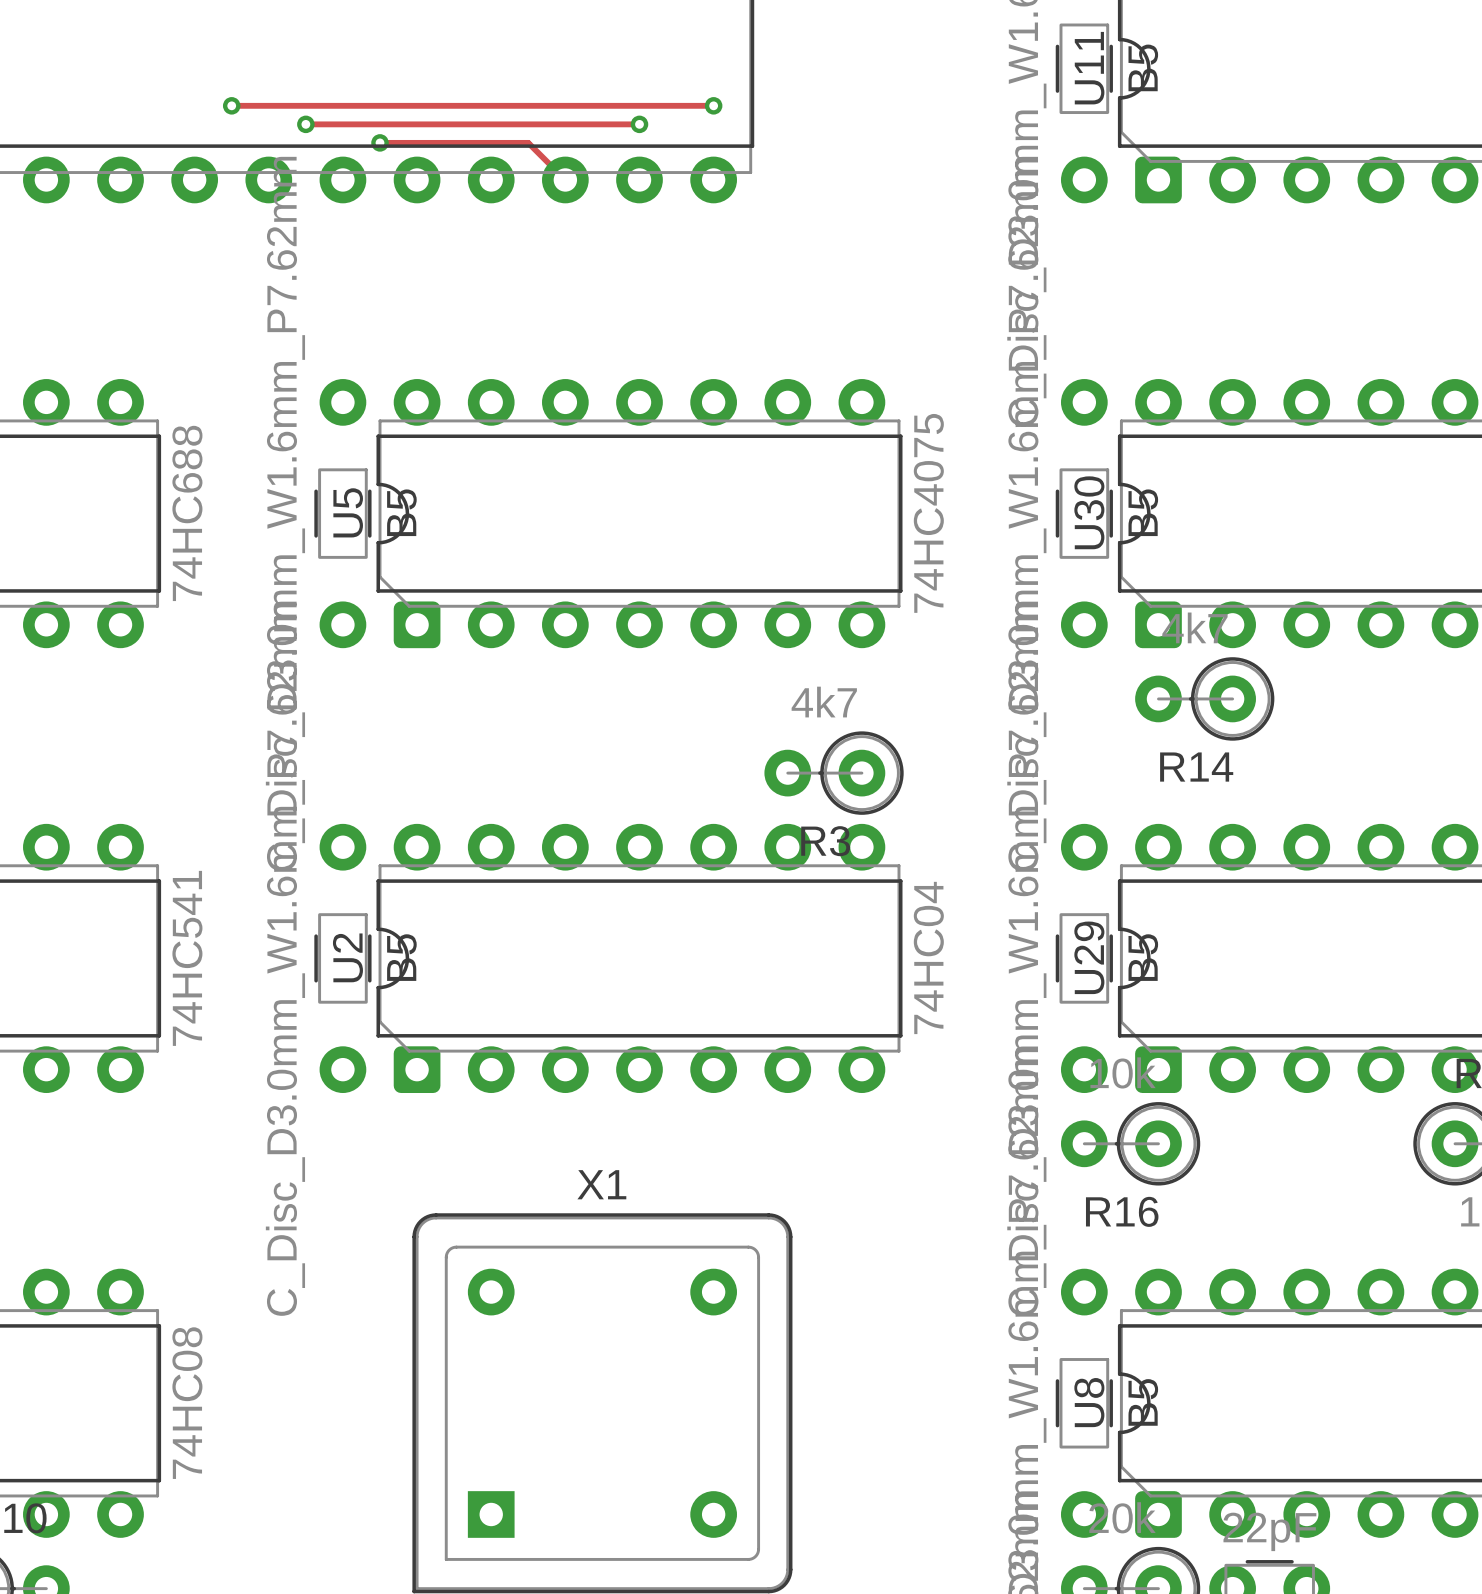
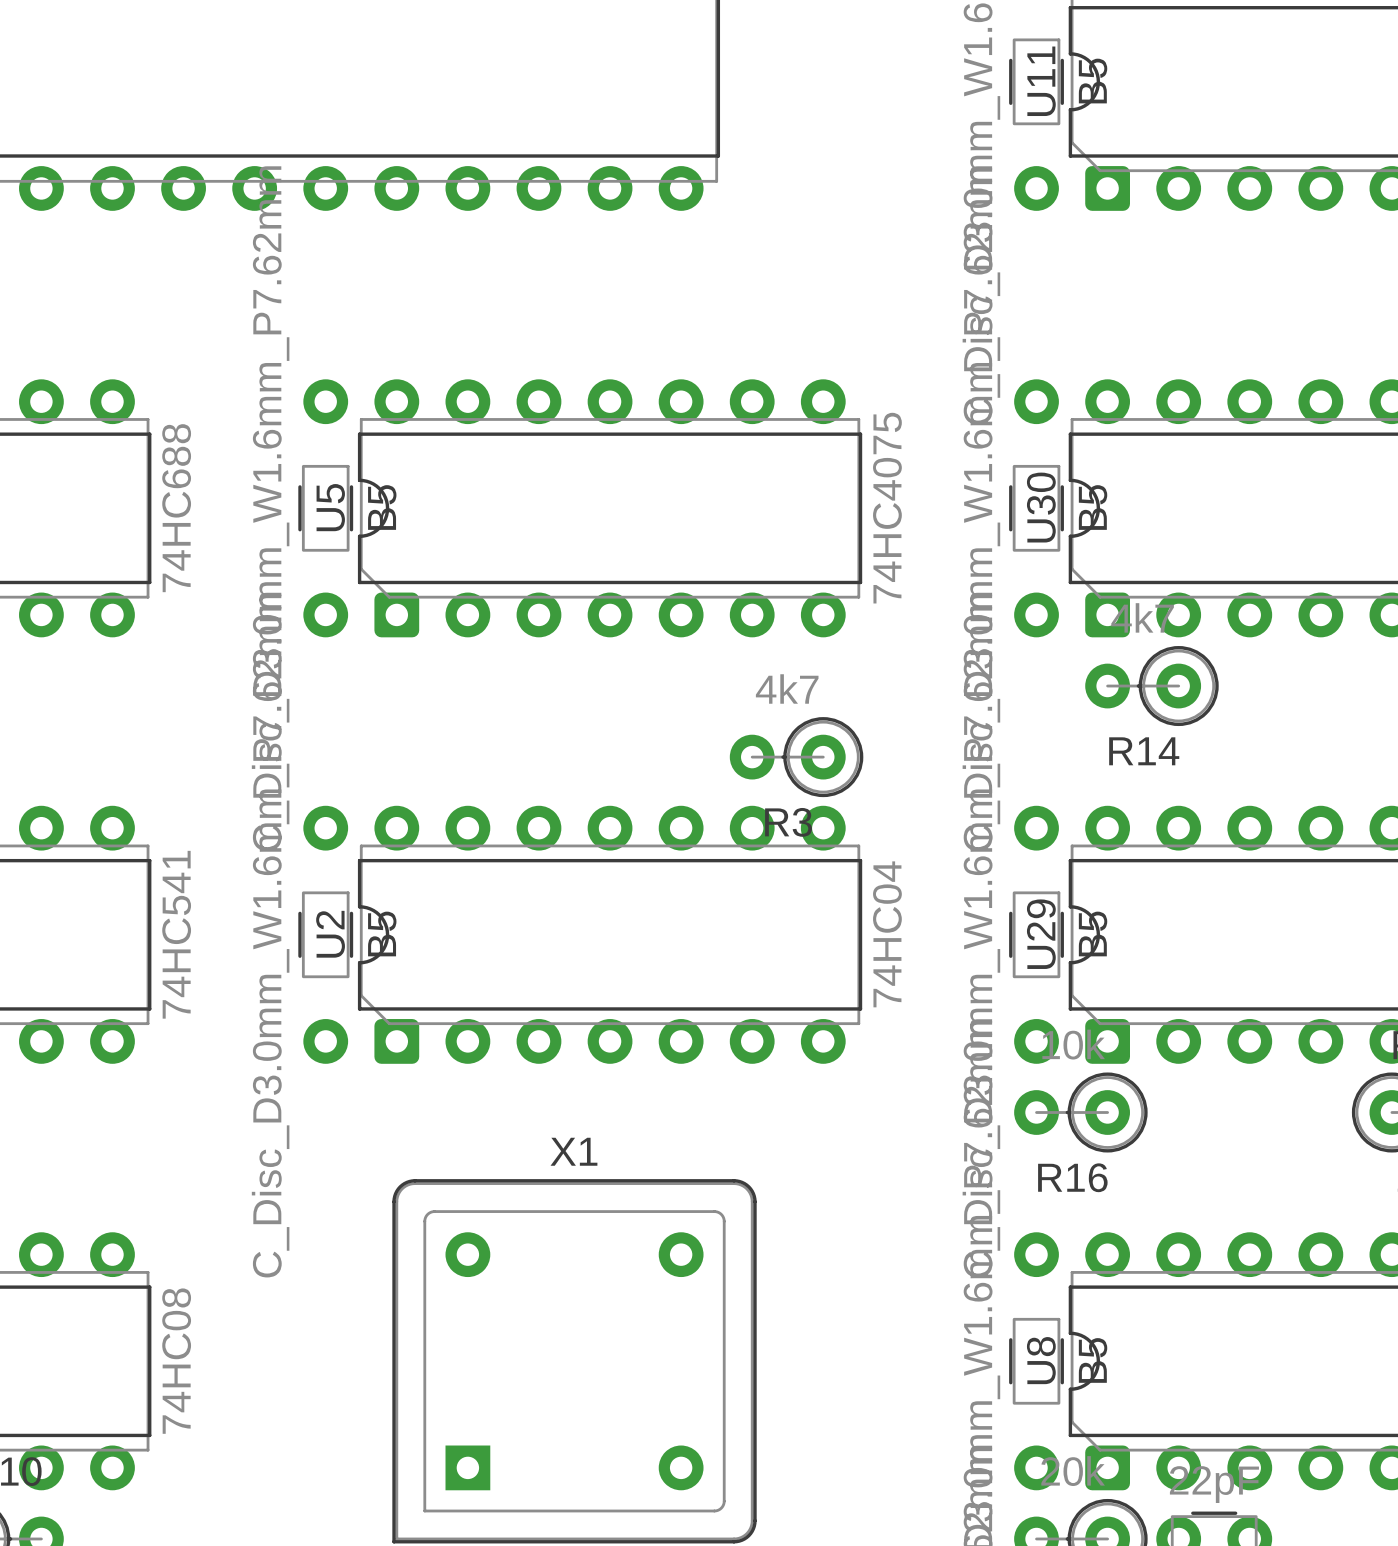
track: (231, 105) (713, 105) -> none
via: (231, 105) -> none
via: (713, 105) -> none
track: (305, 124) (639, 124) -> none
via: (305, 124) -> none
via: (639, 124) -> none
track: (380, 142) (528, 142) (565, 179) -> none
via: (380, 142) -> none

